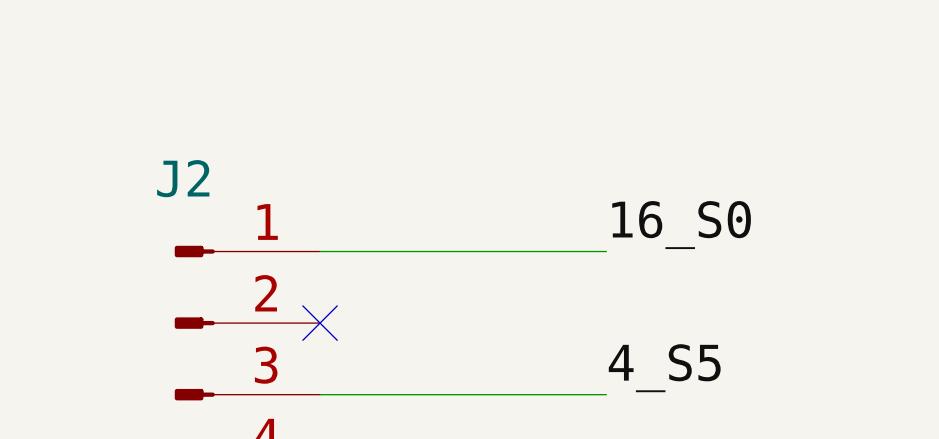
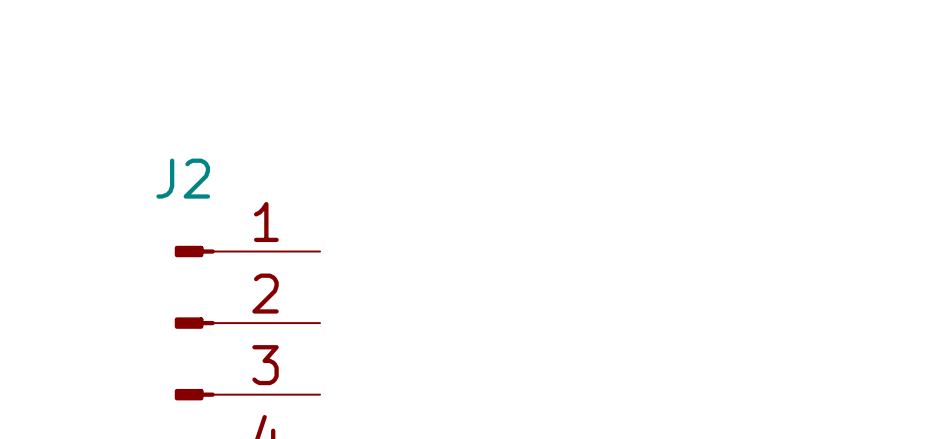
label: 16_S0 (681, 225) -> none
wire: (320, 251) (606, 251) -> none
no-connect mark: (320, 323) -> none
label: 4_S5 (664, 368) -> none
wire: (320, 394) (606, 394) -> none

